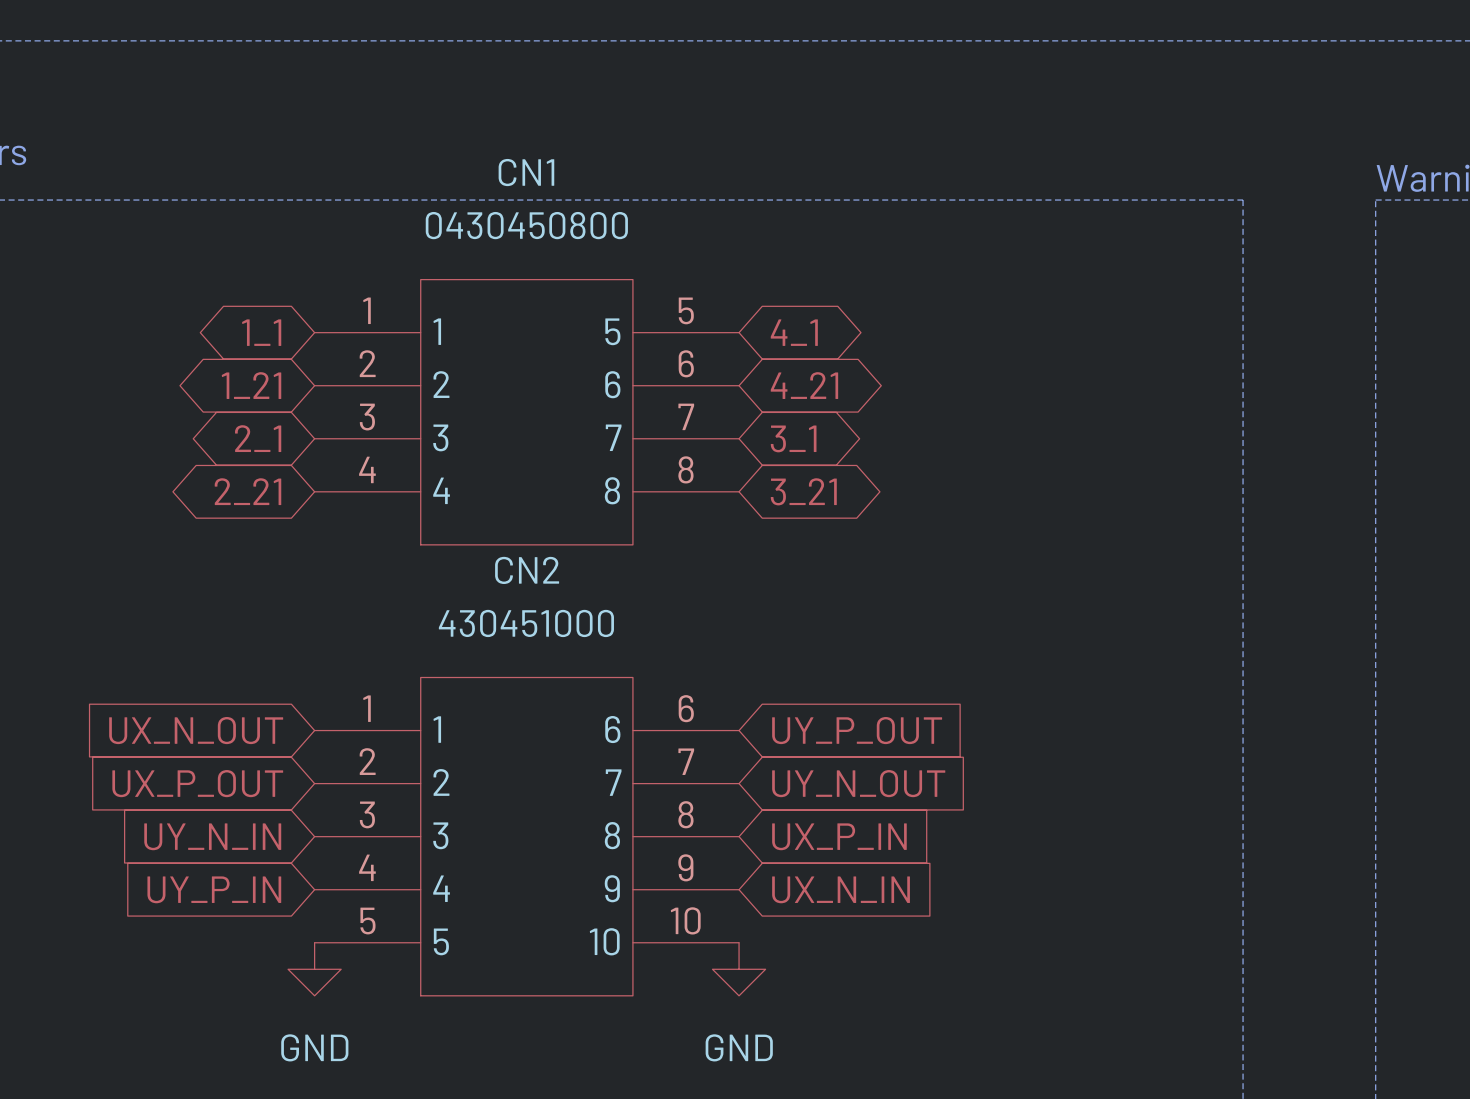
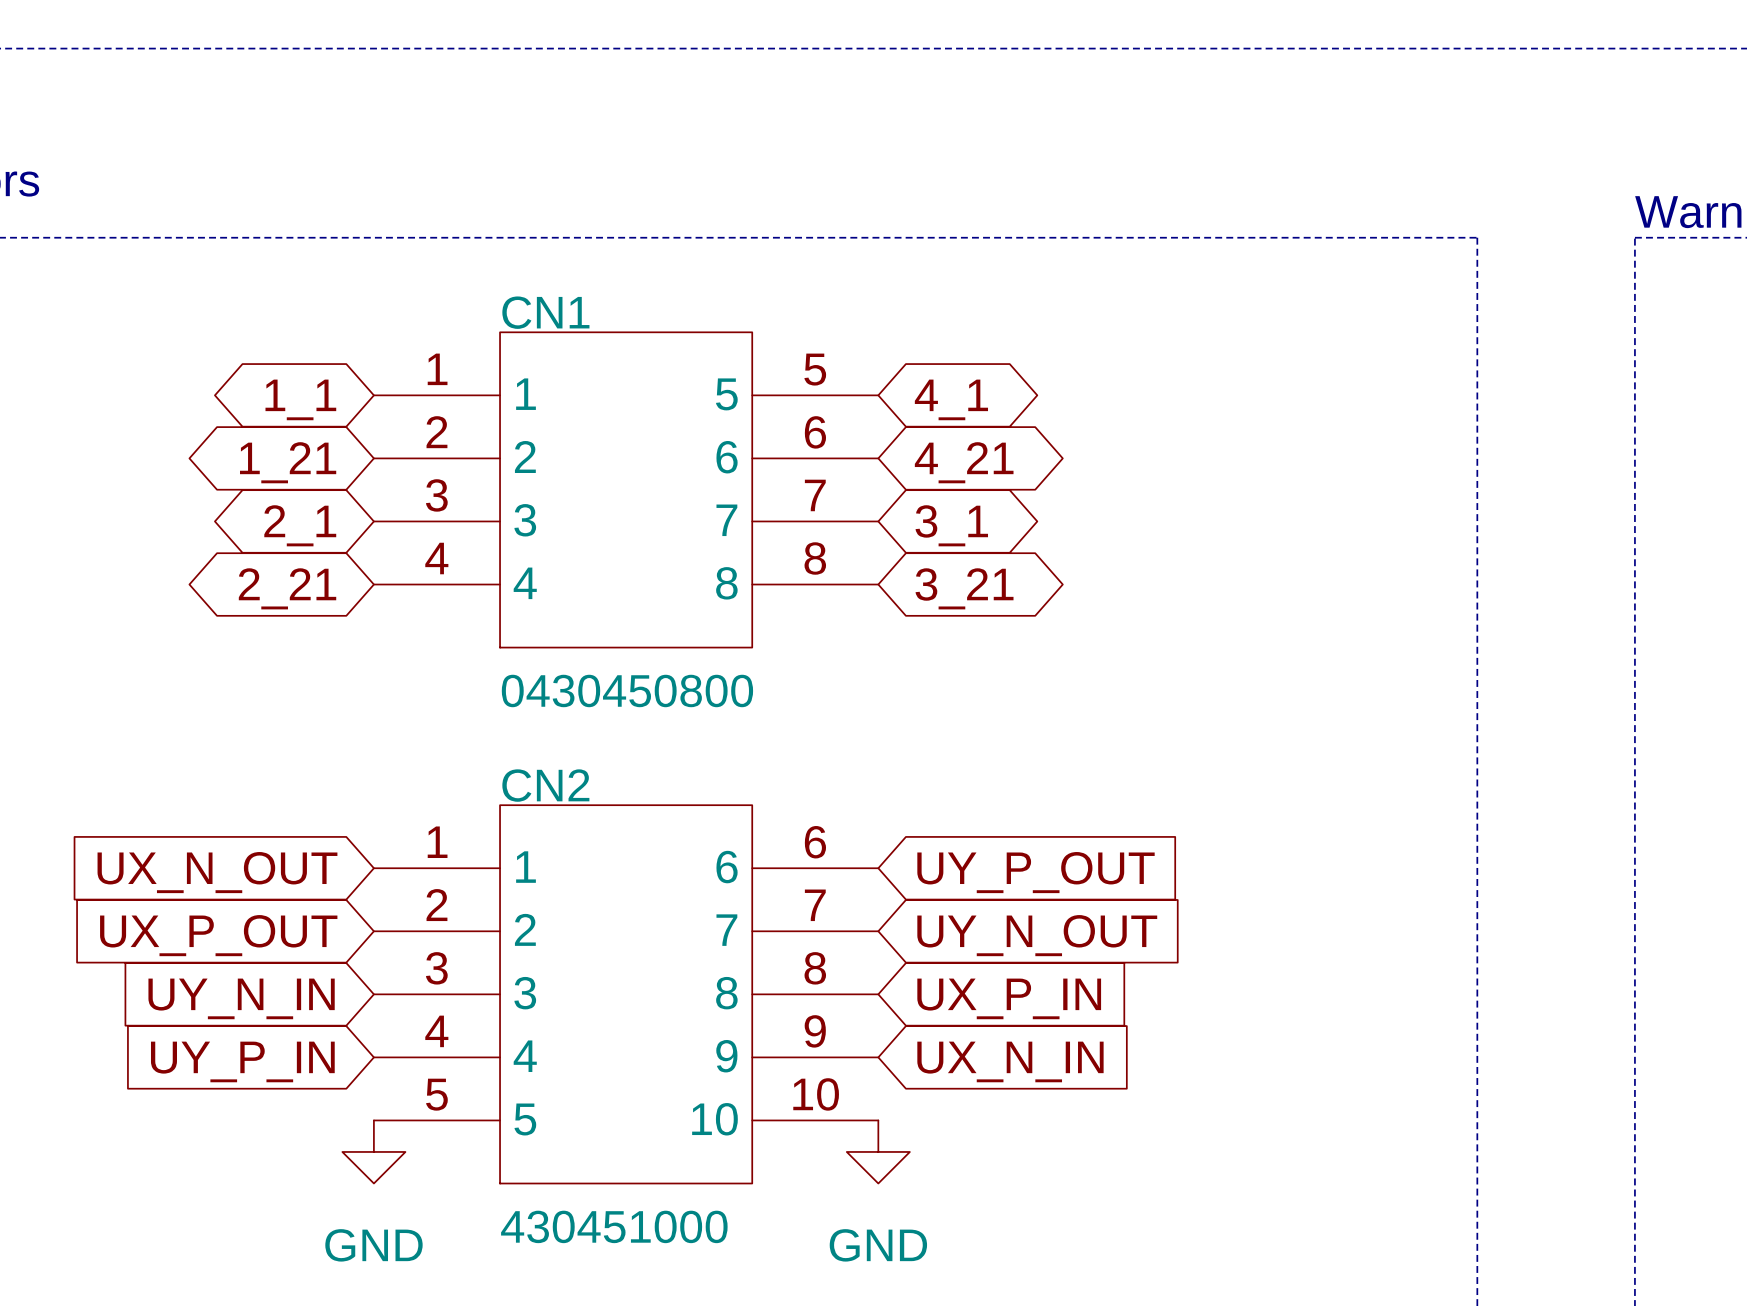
CN1 name position: CN1 (526, 172) -> CN1 (545, 312)
CN1 value position: 0430450800 (526, 225) -> 0430450800 (627, 690)
CN2 name position: CN2 (527, 570) -> CN2 (545, 785)
CN2 value position: 430451000 (526, 623) -> 430451000 (614, 1226)

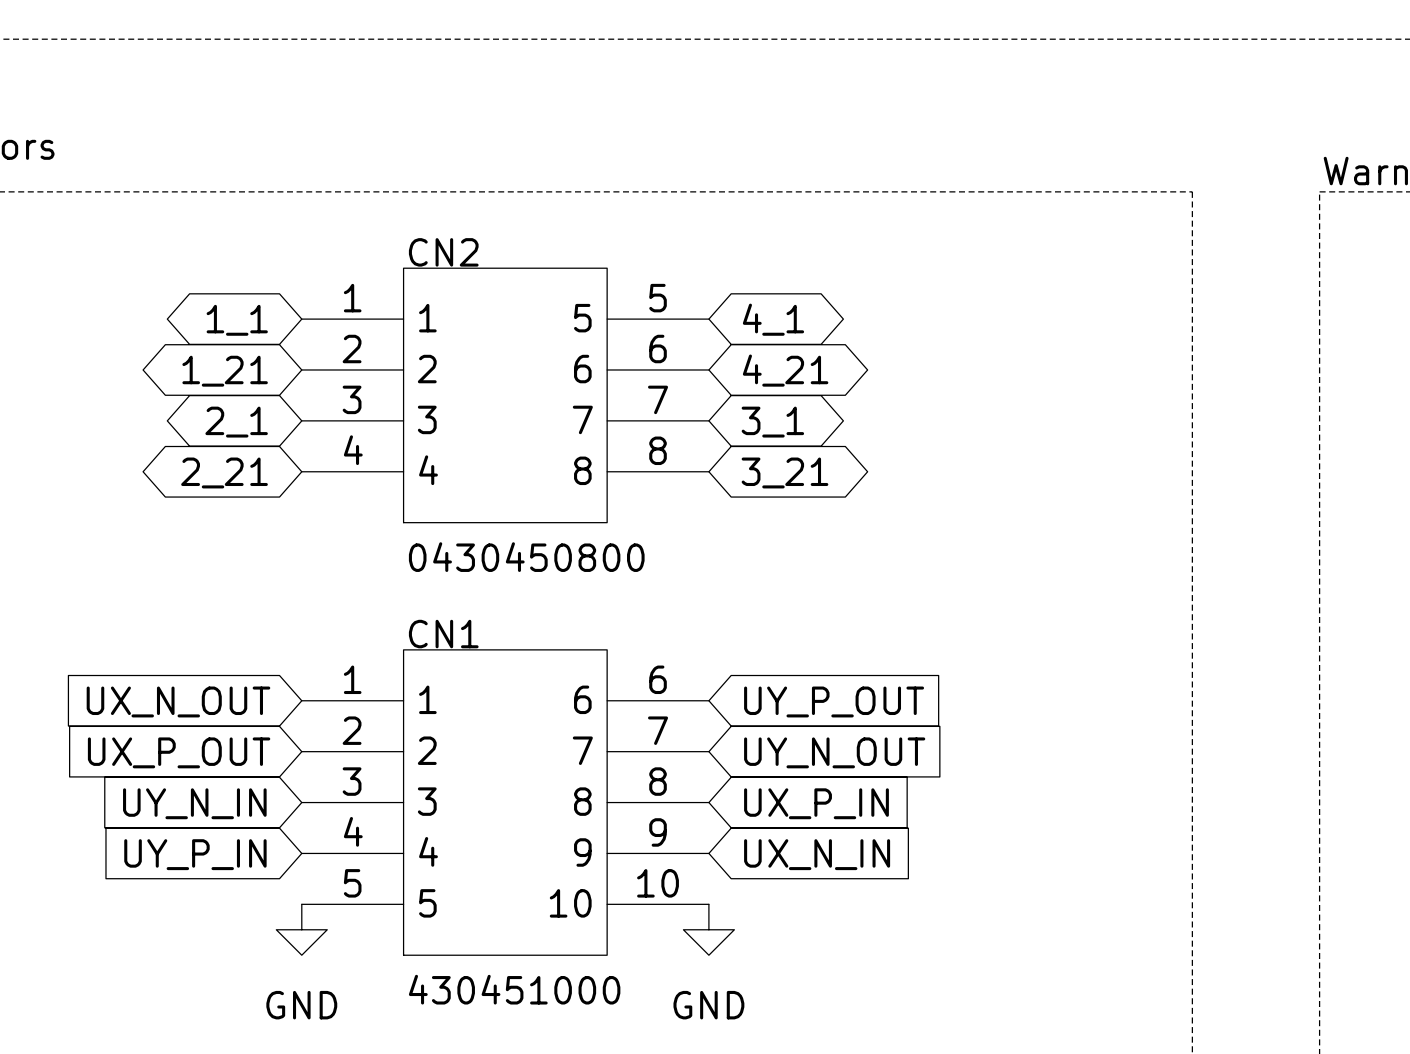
CN1 name: CN1 (545, 312) -> CN2 (443, 252)
CN2 name: CN2 (545, 785) -> CN1 (443, 634)

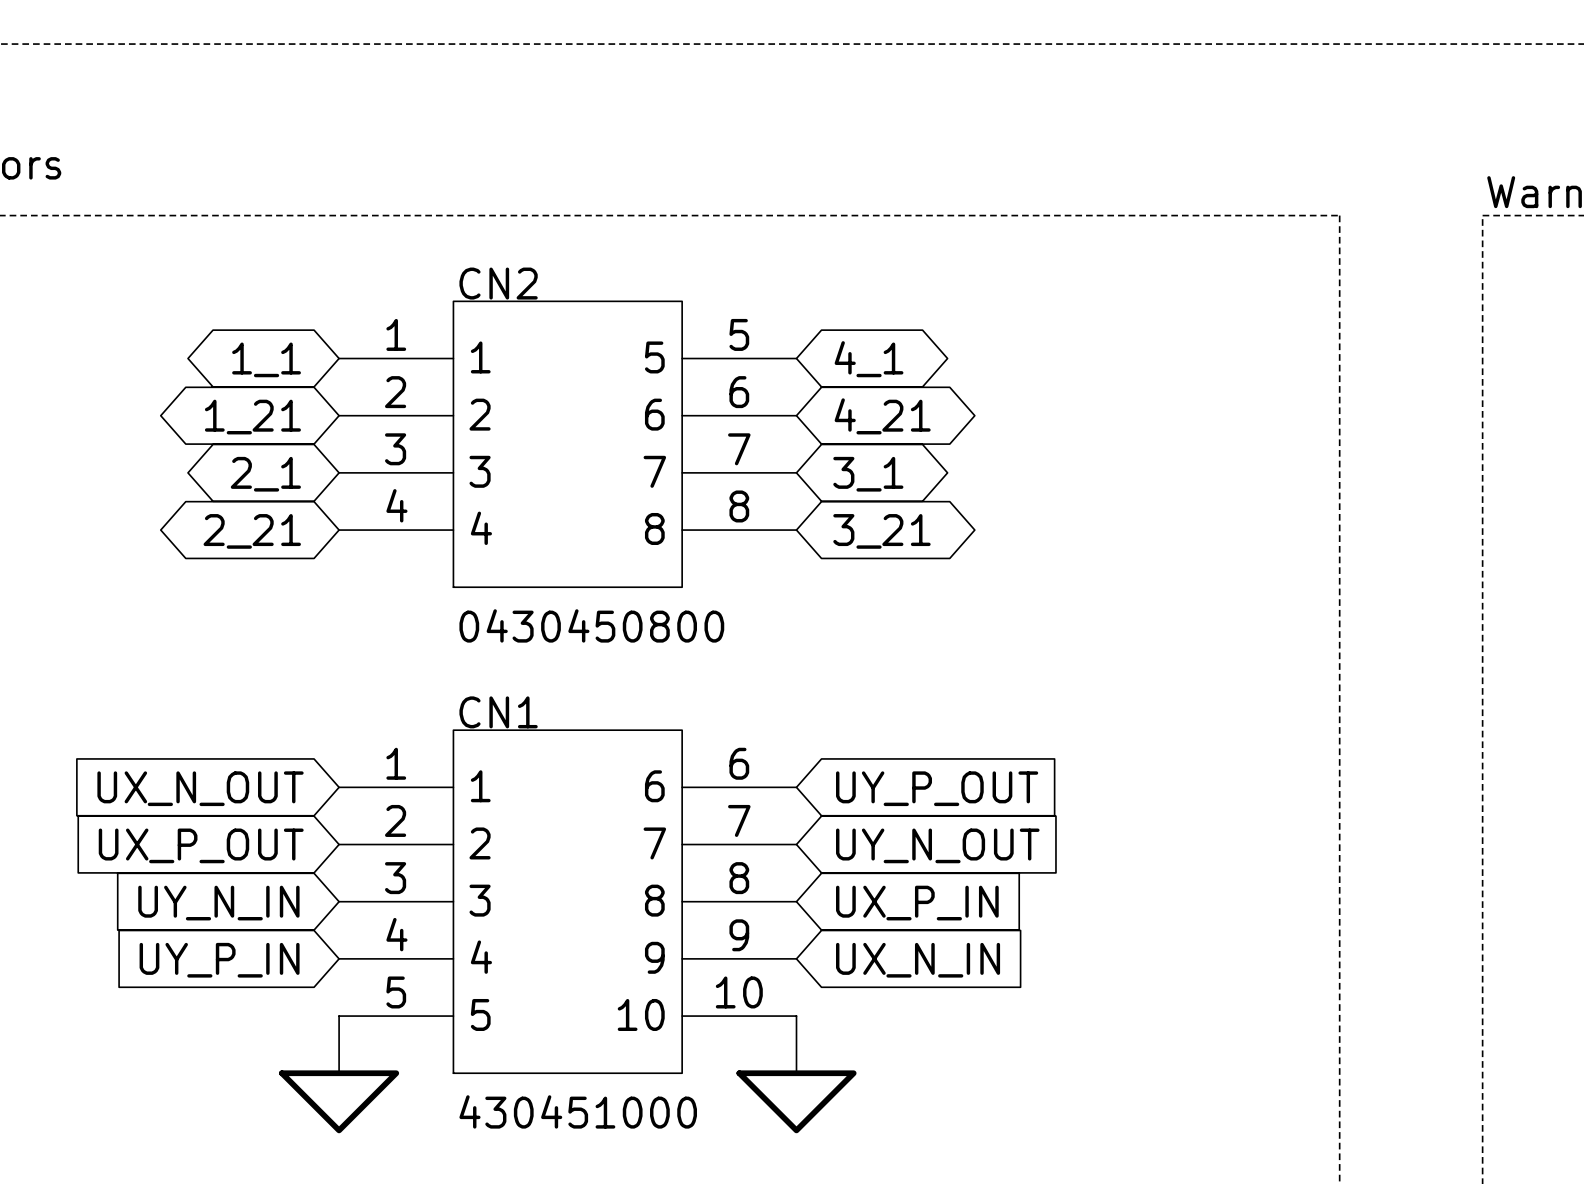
power symbol: GND (301, 929) -> none
power symbol: GND (708, 929) -> none
power symbol: none -> (339, 1074)
power symbol: none -> (796, 1074)

